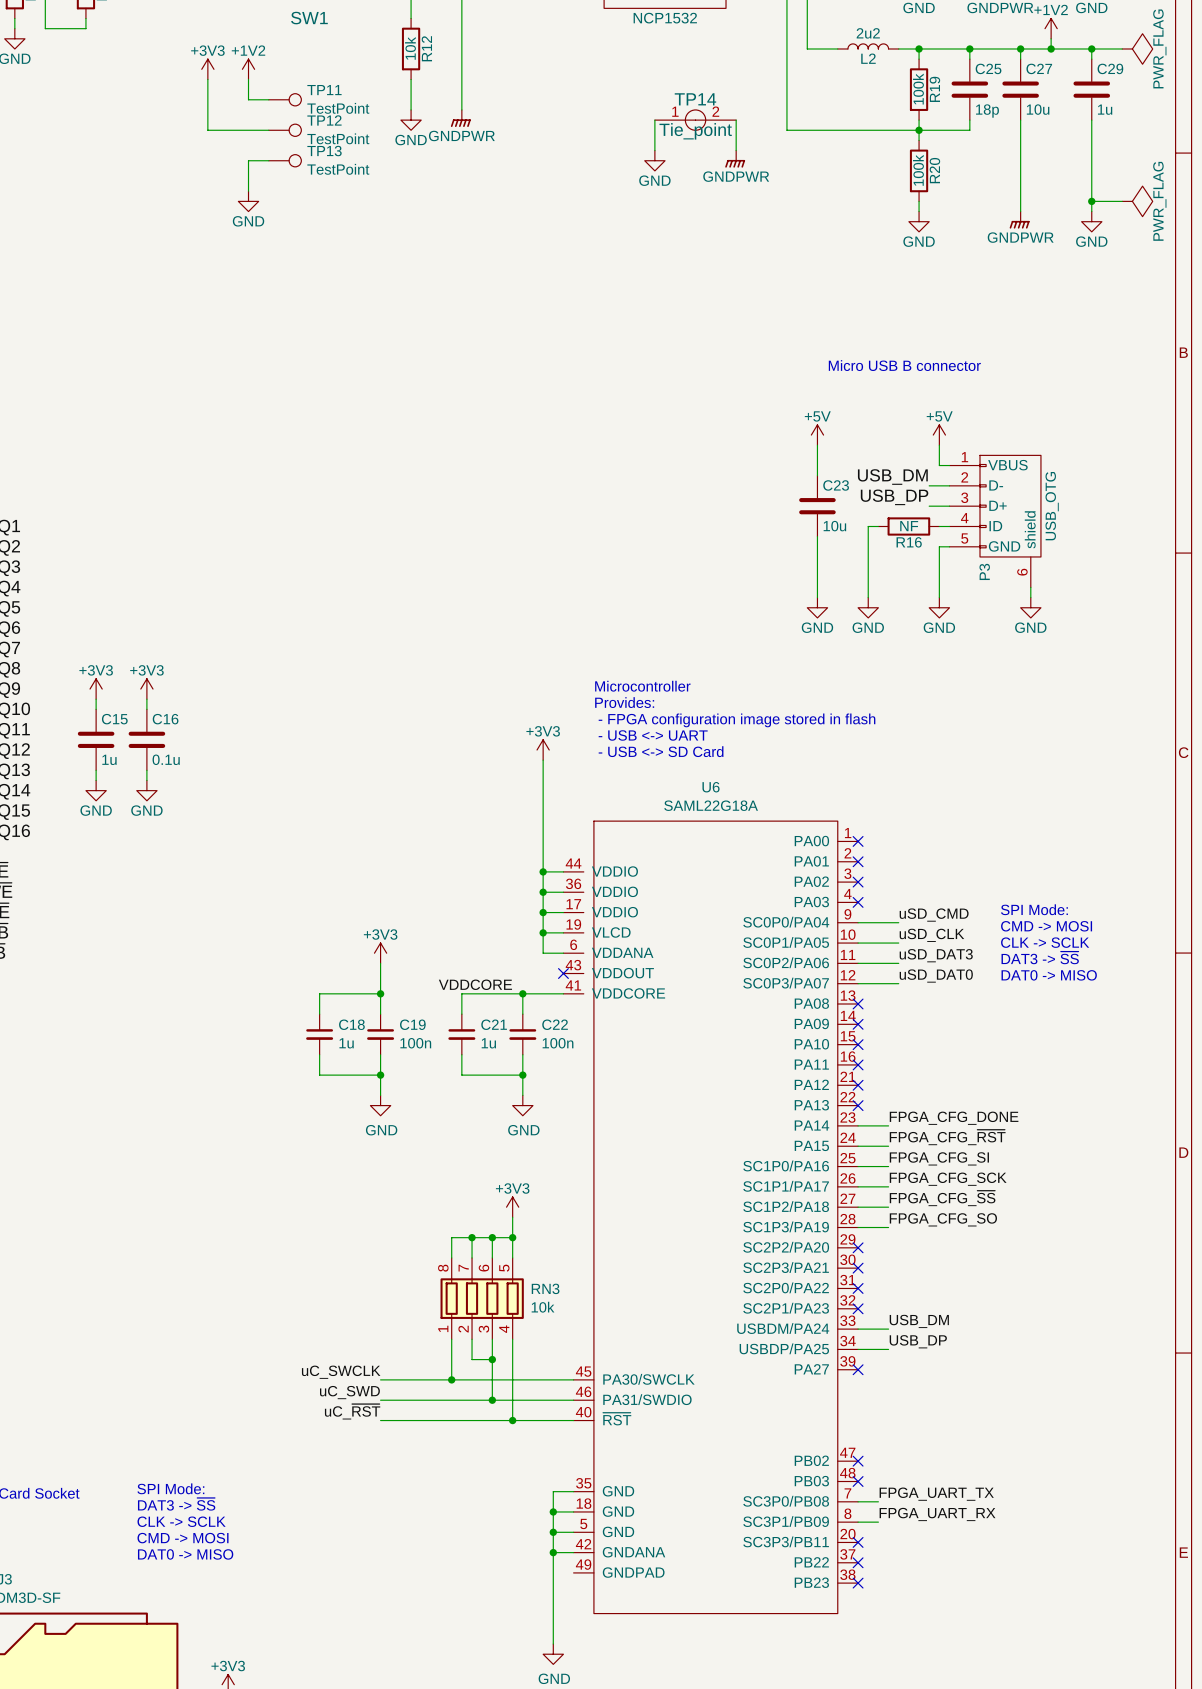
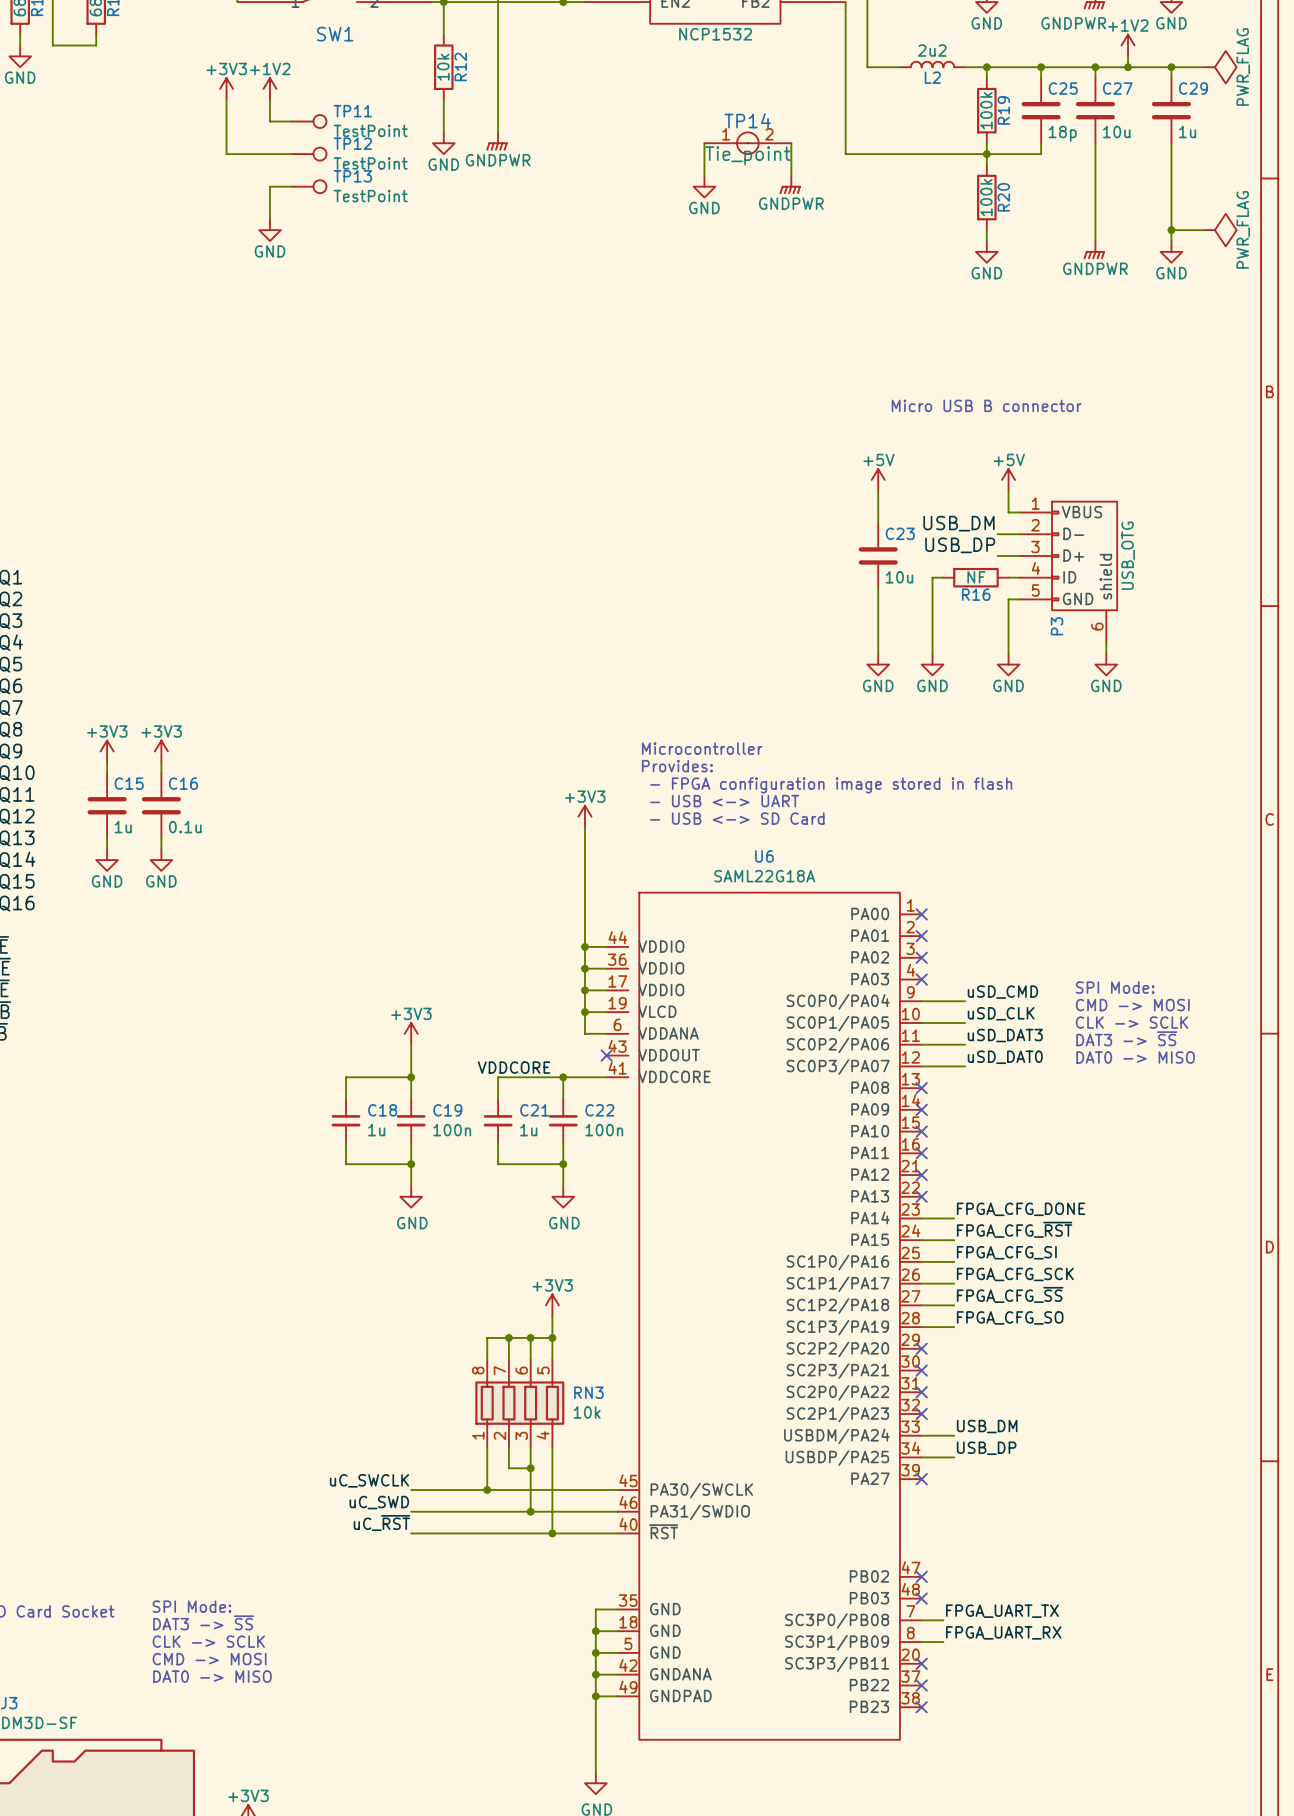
wire: none -> (595, 1696) (617, 1696)
junction: none -> (595, 1696)

